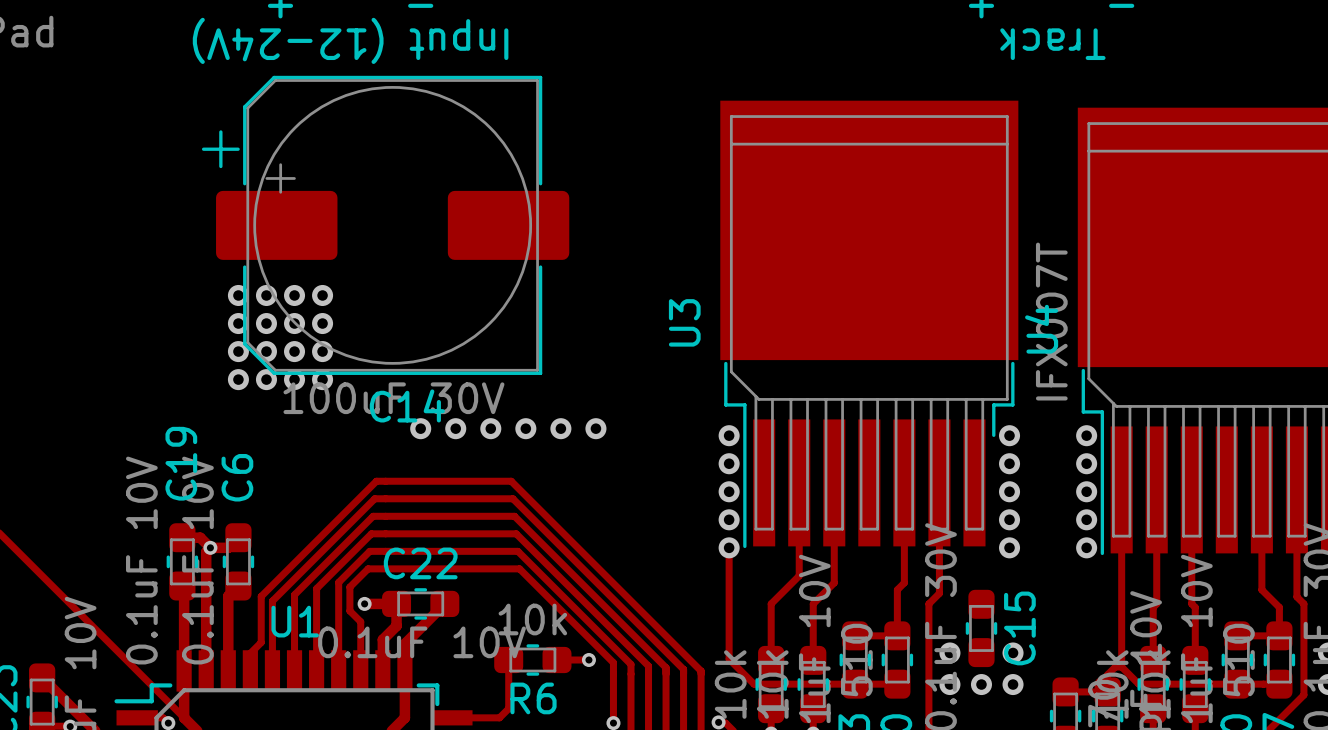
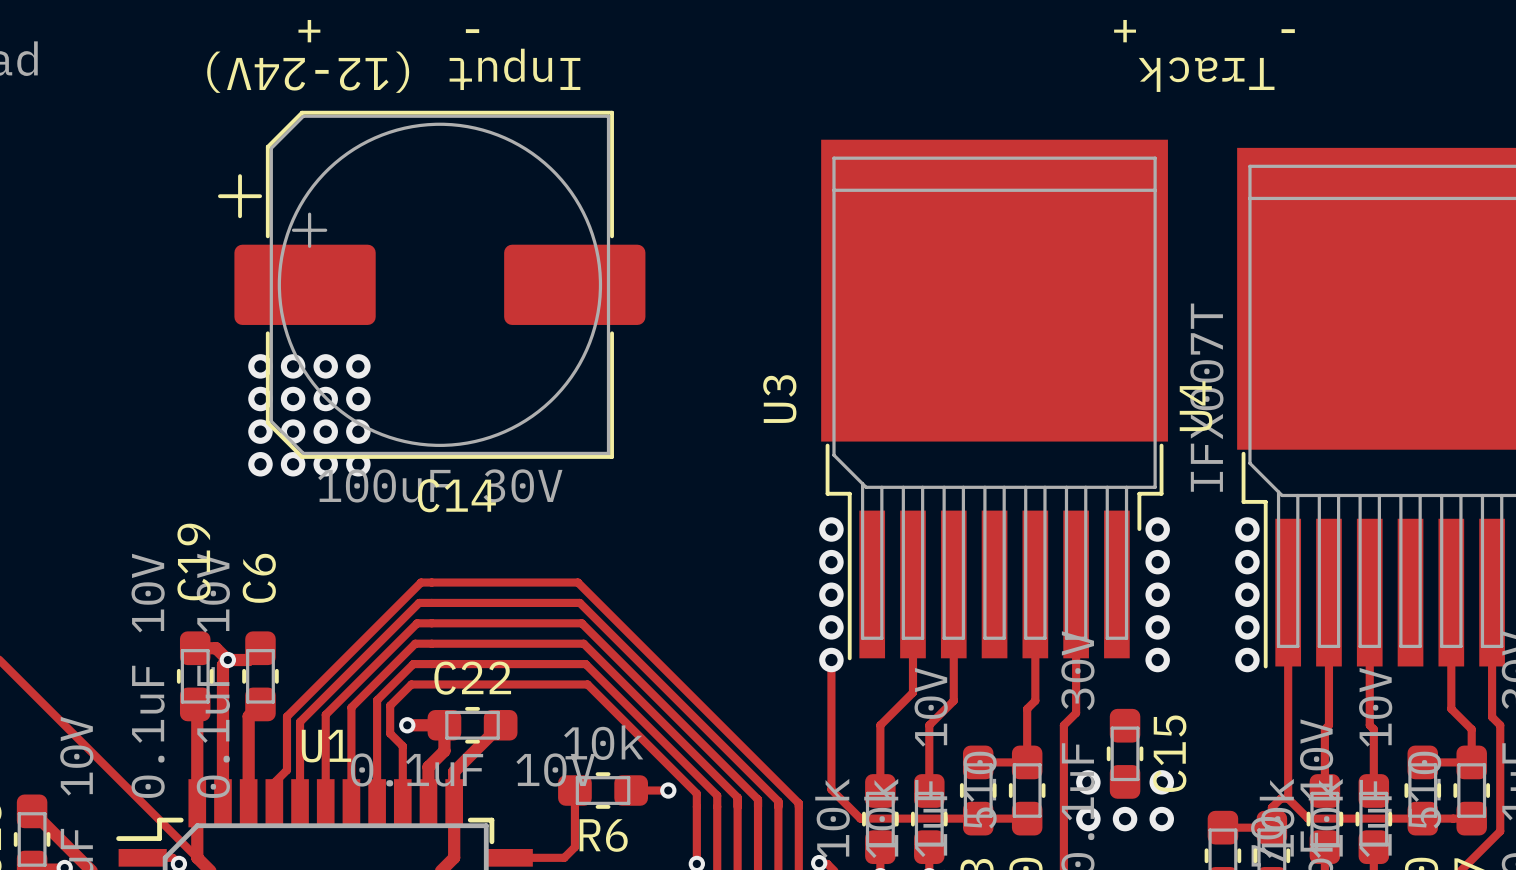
via: (420, 428) -> none
via: (455, 428) -> none
via: (490, 428) -> none
via: (525, 428) -> none
via: (560, 428) -> none
via: (595, 428) -> none

